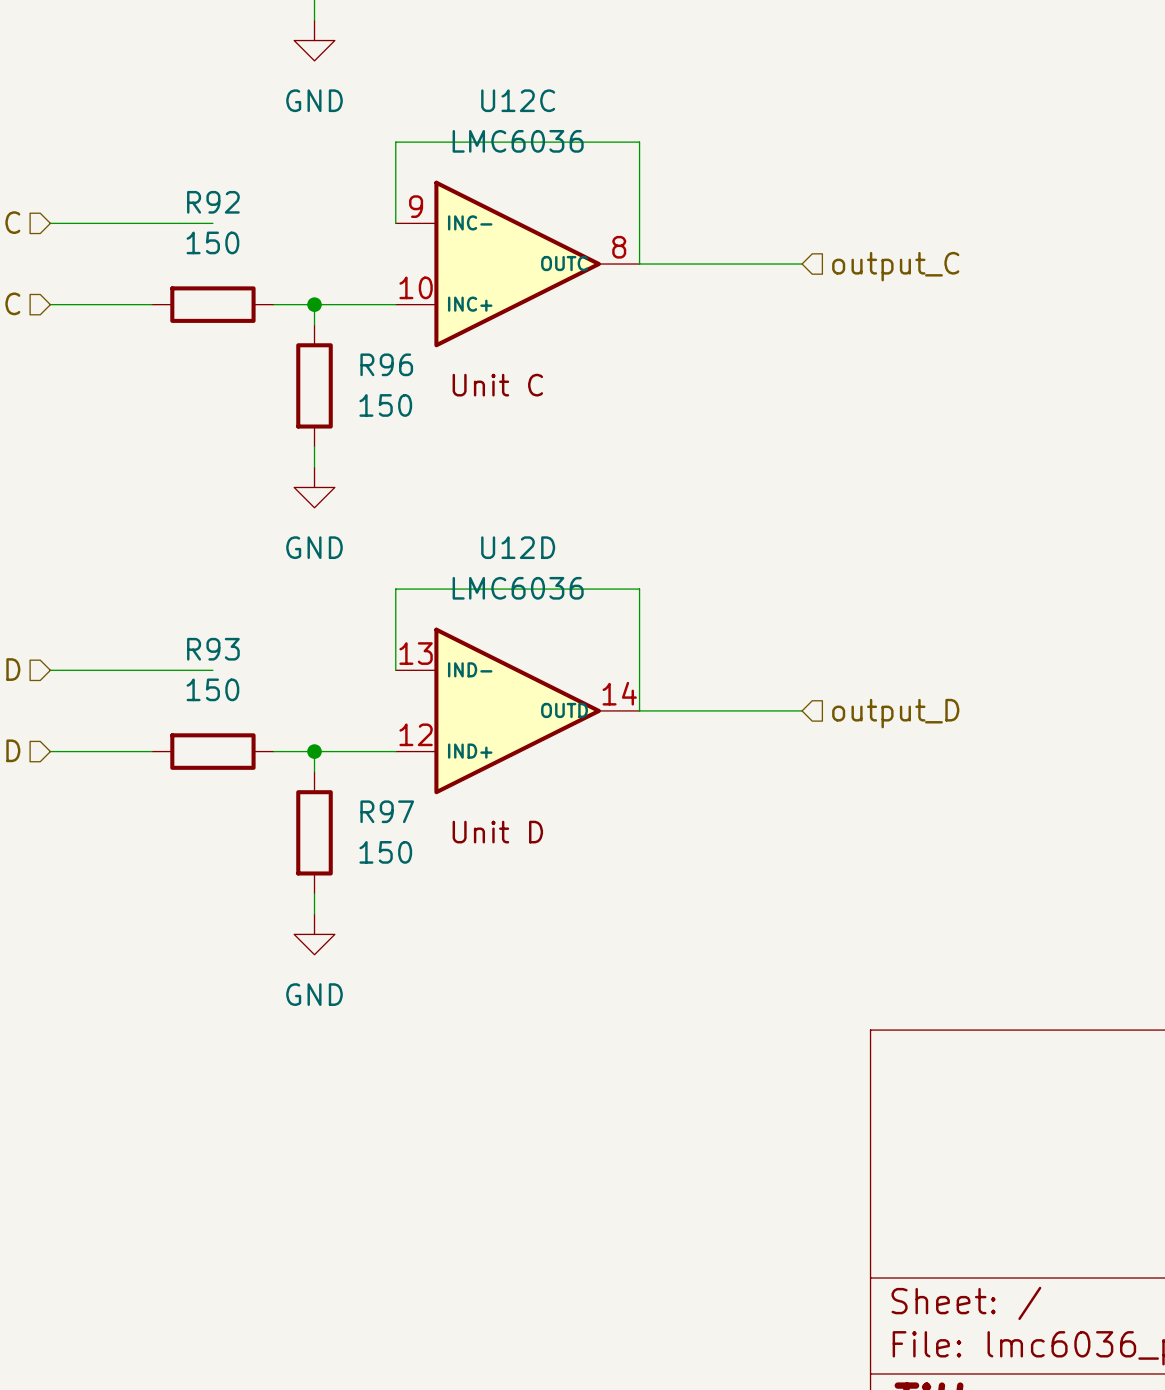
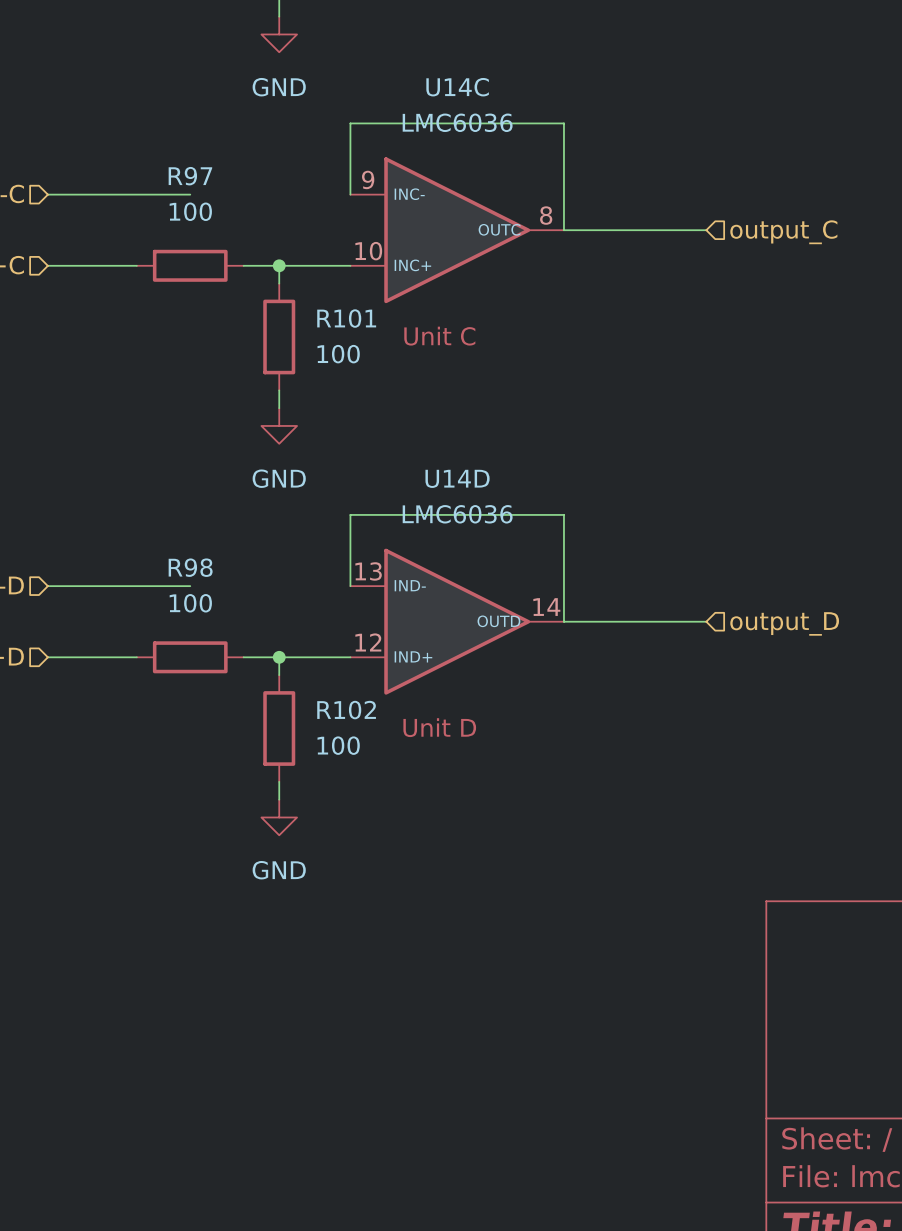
U12C name: U12C (518, 100) -> U14C (457, 87)
R92 name: R92 (213, 202) -> R97 (190, 176)
R92 value: 150 (212, 242) -> 100 (190, 211)
R96 name: R96 (386, 364) -> R101 (346, 318)
R96 value: 150 (385, 405) -> 100 (338, 354)
U12D name: U12D (518, 547) -> U14D (457, 478)
R93 name: R93 (213, 649) -> R98 (190, 567)
R93 value: 150 (212, 689) -> 100 (190, 603)
R97 name: R97 (387, 811) -> R102 (346, 710)
R97 value: 150 (385, 852) -> 100 (338, 745)

